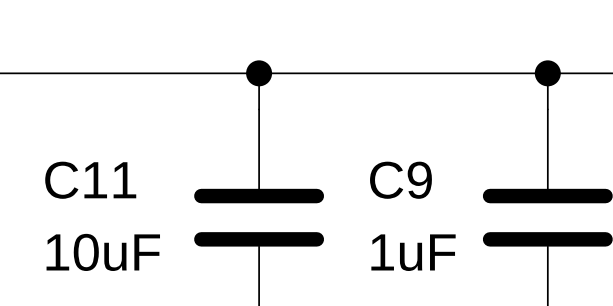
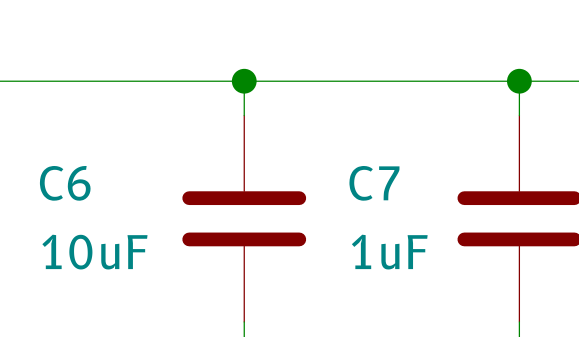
C11 name: C11 (90, 180) -> C6 (65, 183)
C9 name: C9 (400, 180) -> C7 (374, 183)

